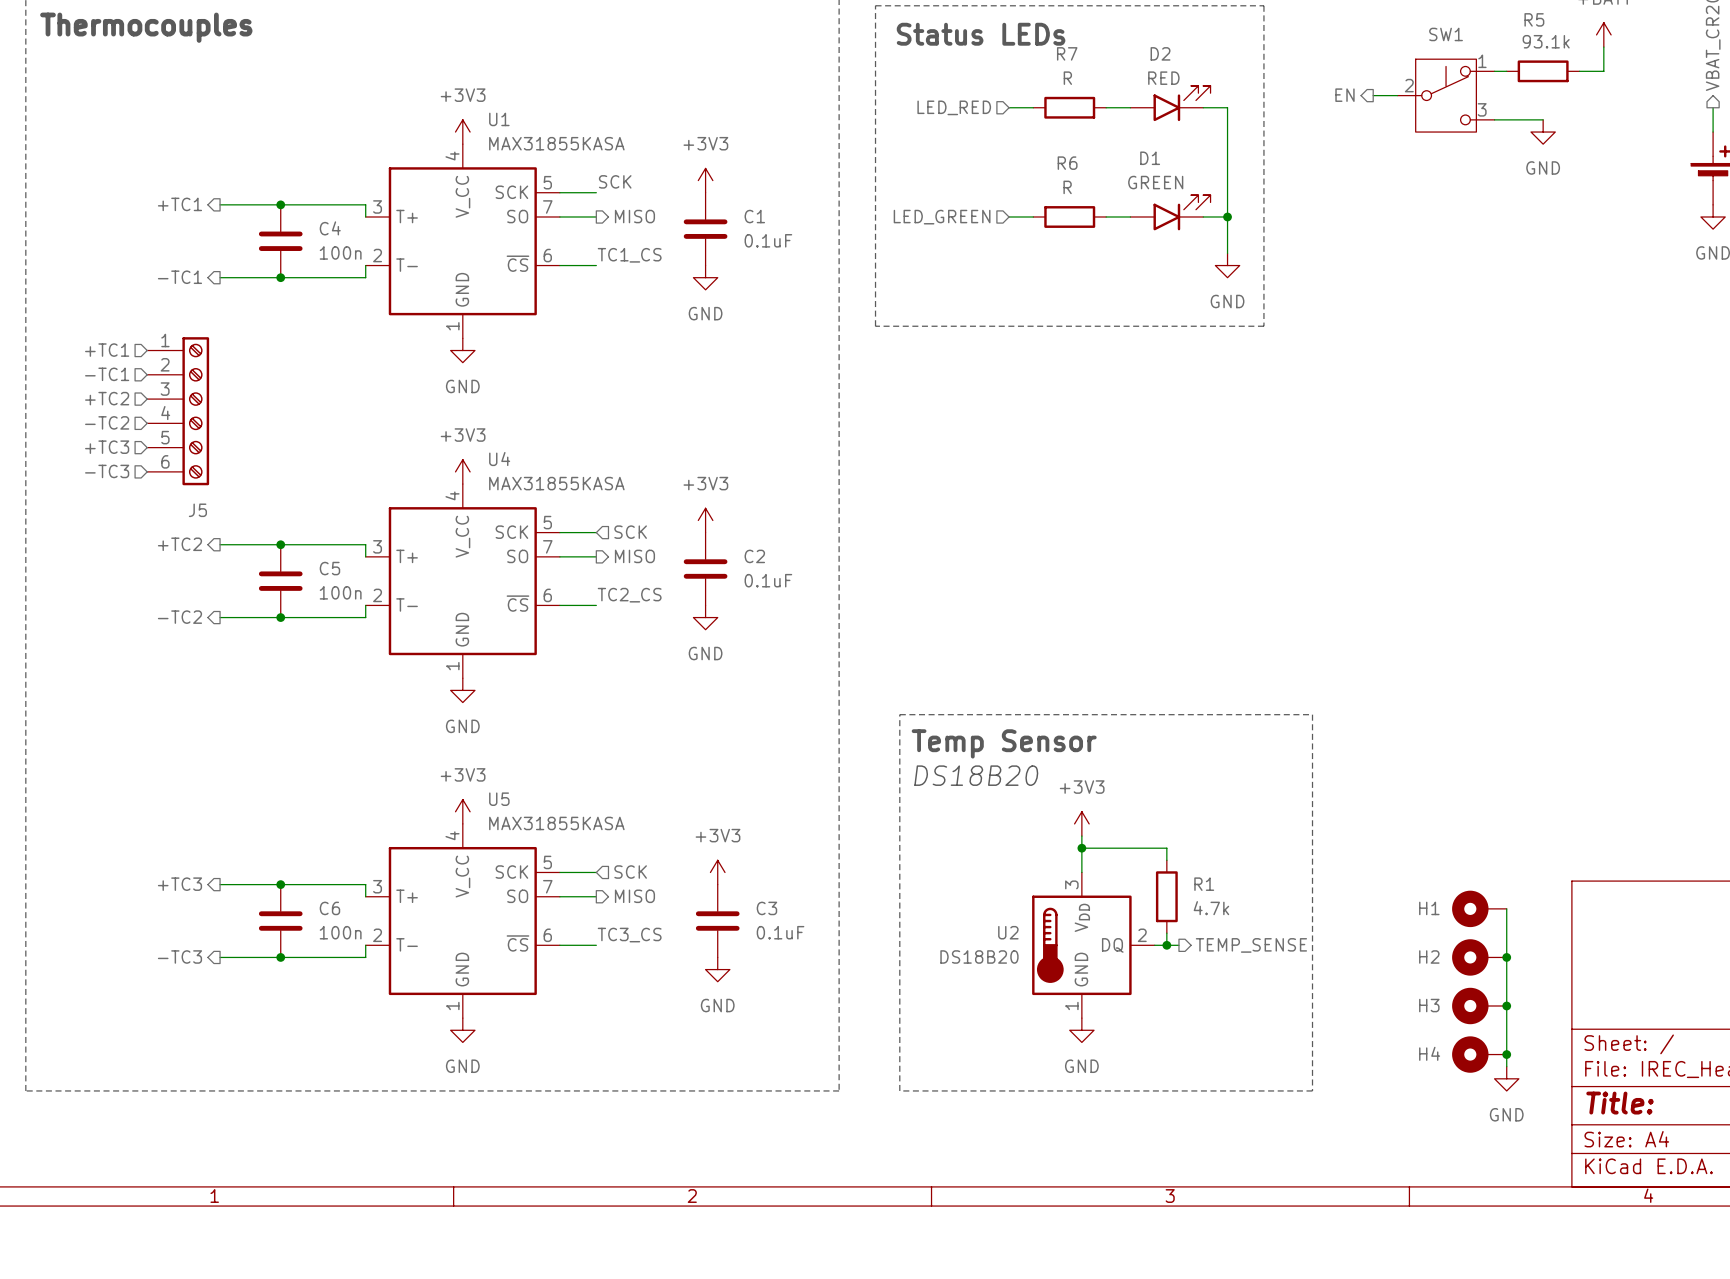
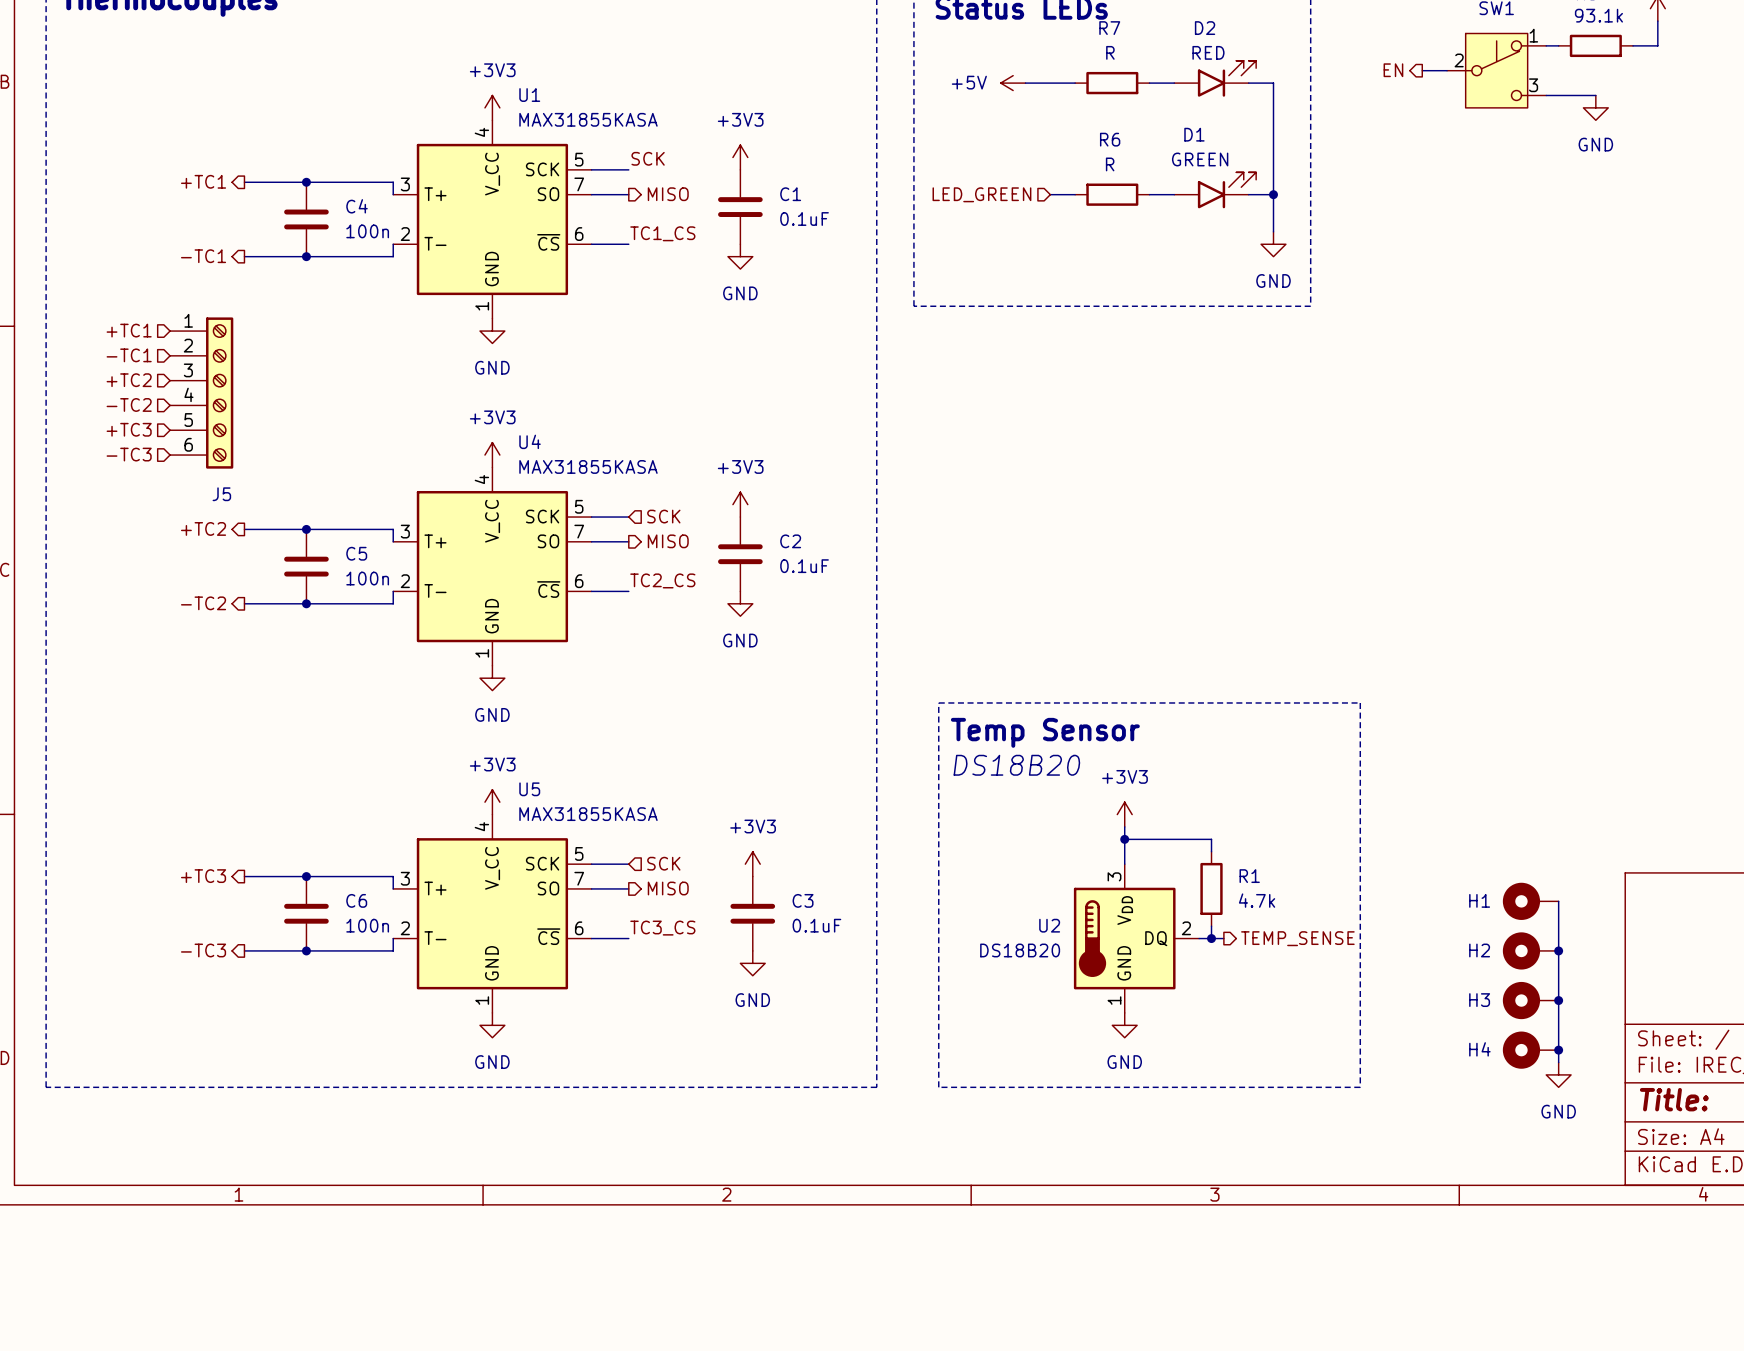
hierarchical label: LED_RED (954, 107) -> none
power symbol: none -> +5V (1013, 83)
wire: none -> (1025, 83) (1050, 83)

